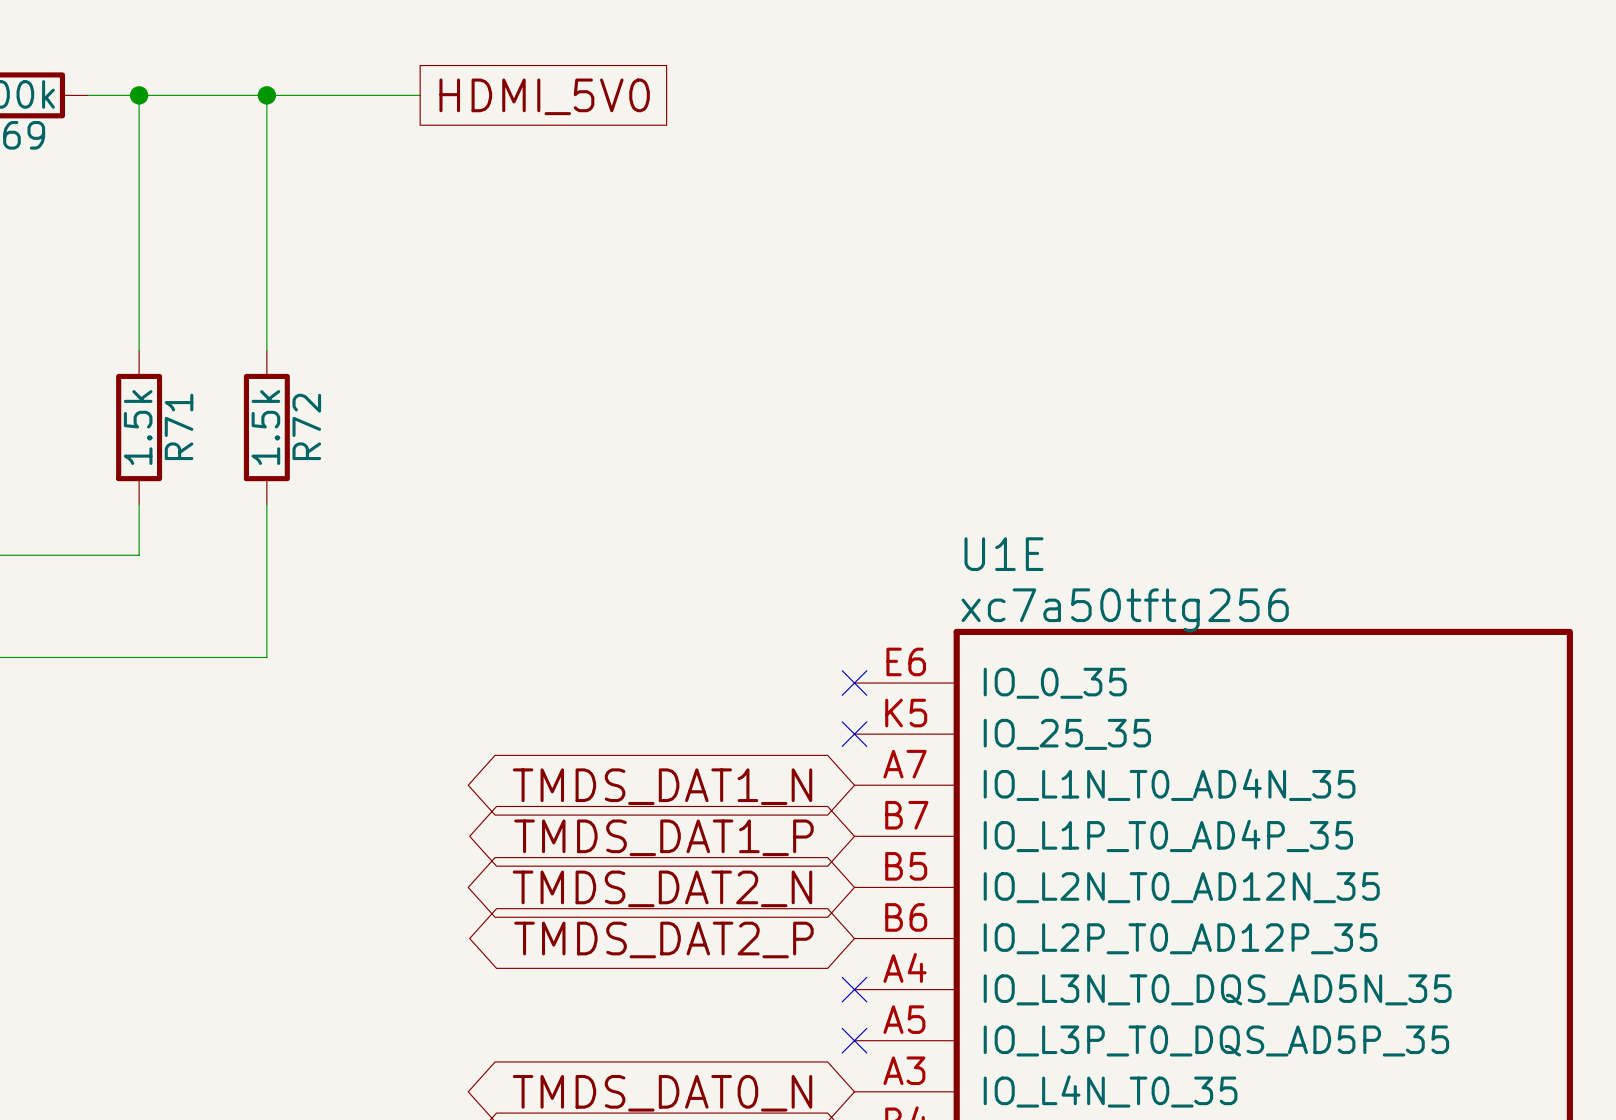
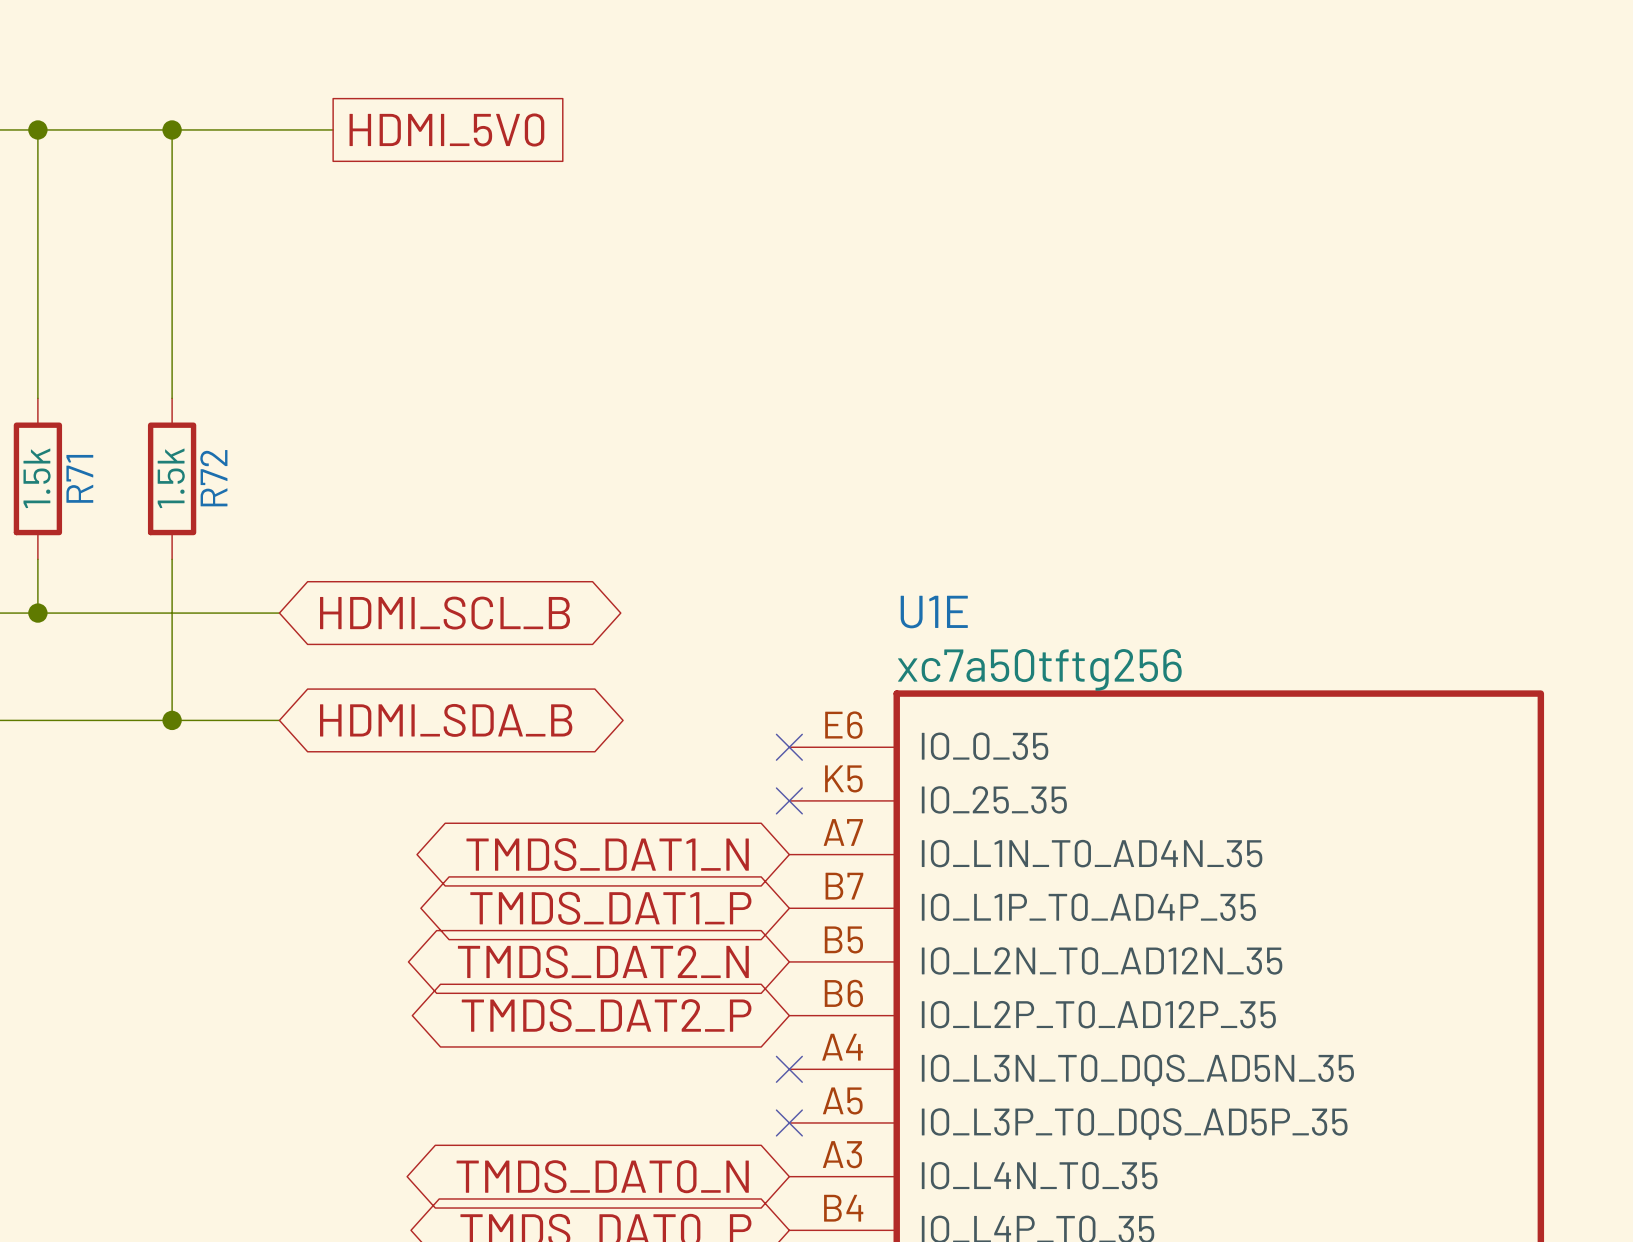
wire: none -> (37, 613) (279, 613)
junction: none -> (37, 613)
global label: none -> HDMI_SCL_B (445, 613)
wire: none -> (172, 720) (279, 720)
junction: none -> (172, 720)
global label: none -> HDMI_SDA_B (446, 720)

